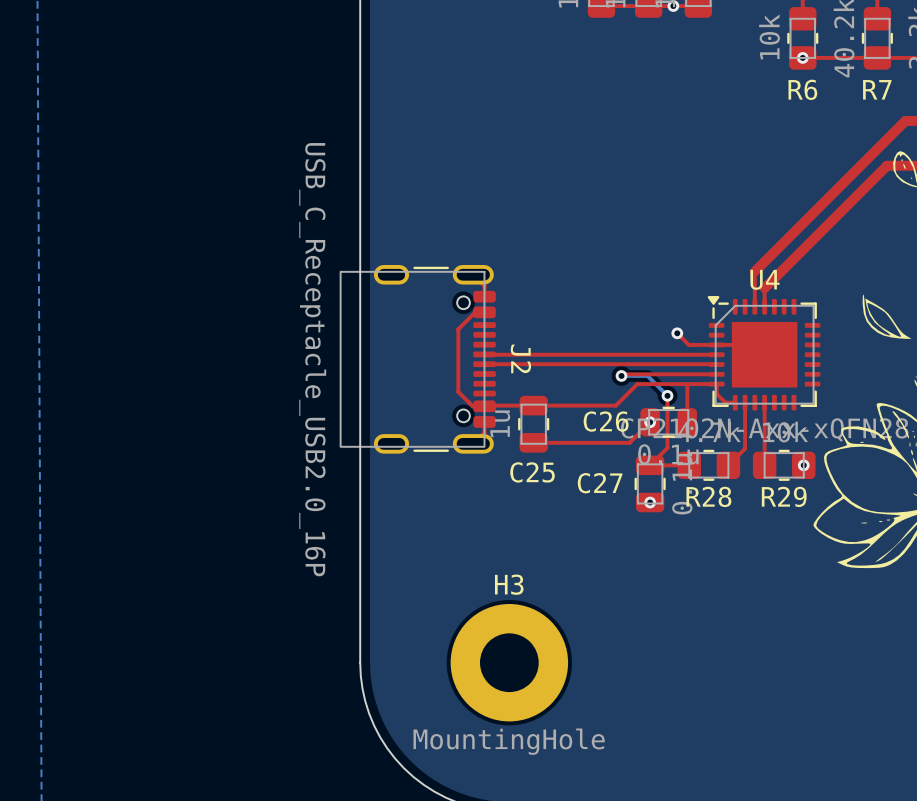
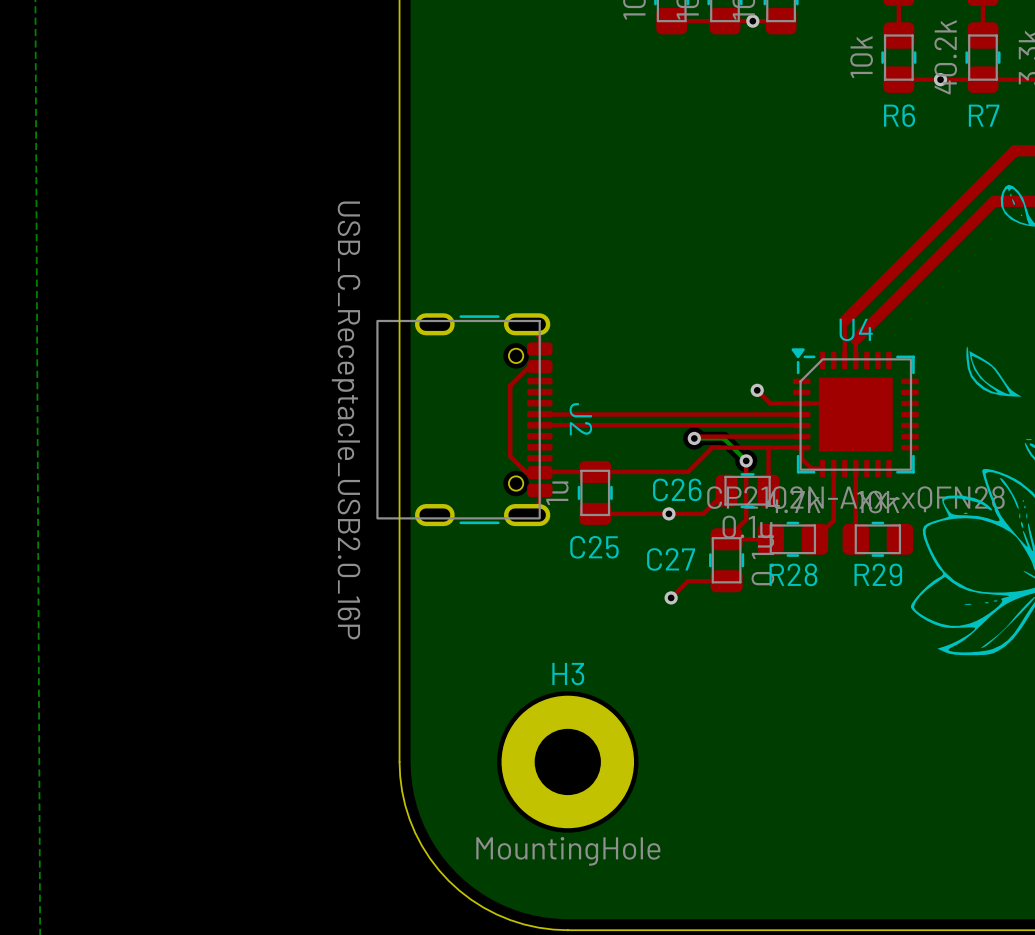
via position: (802, 57) -> (940, 79)
via: (650, 422) -> none
via: none -> (668, 513)
via: (803, 465) -> none
top track: none -> (726, 581) (687, 581) (671, 597)
via: (650, 502) -> none
via: none -> (671, 597)

